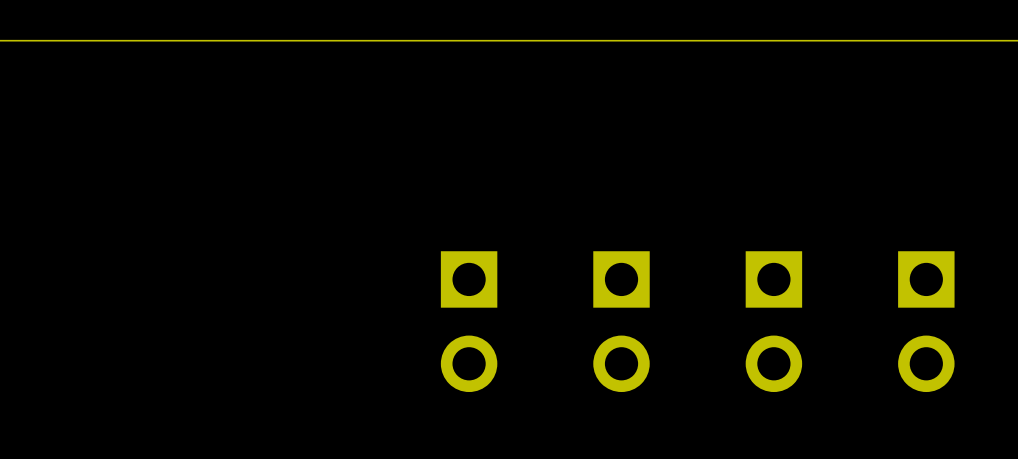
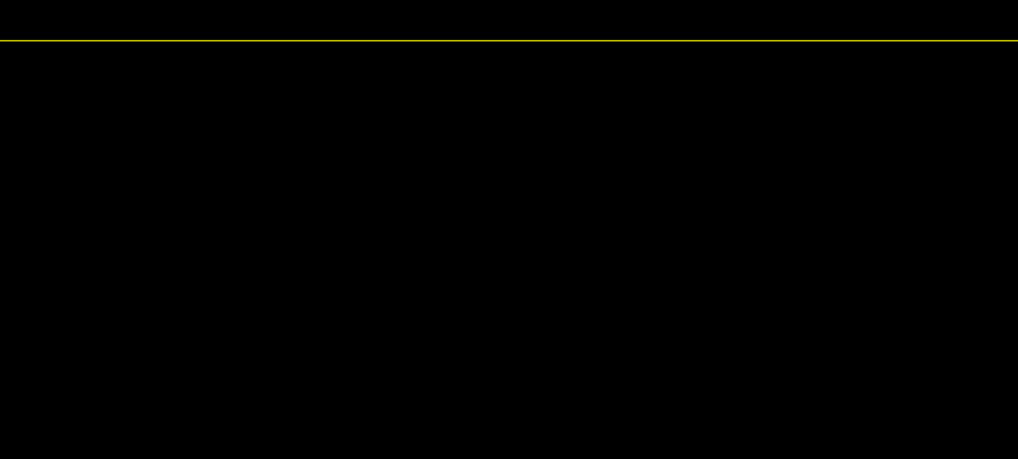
part: (469, 321) -> none
part: (621, 321) -> none
part: (773, 321) -> none
part: (926, 321) -> none

